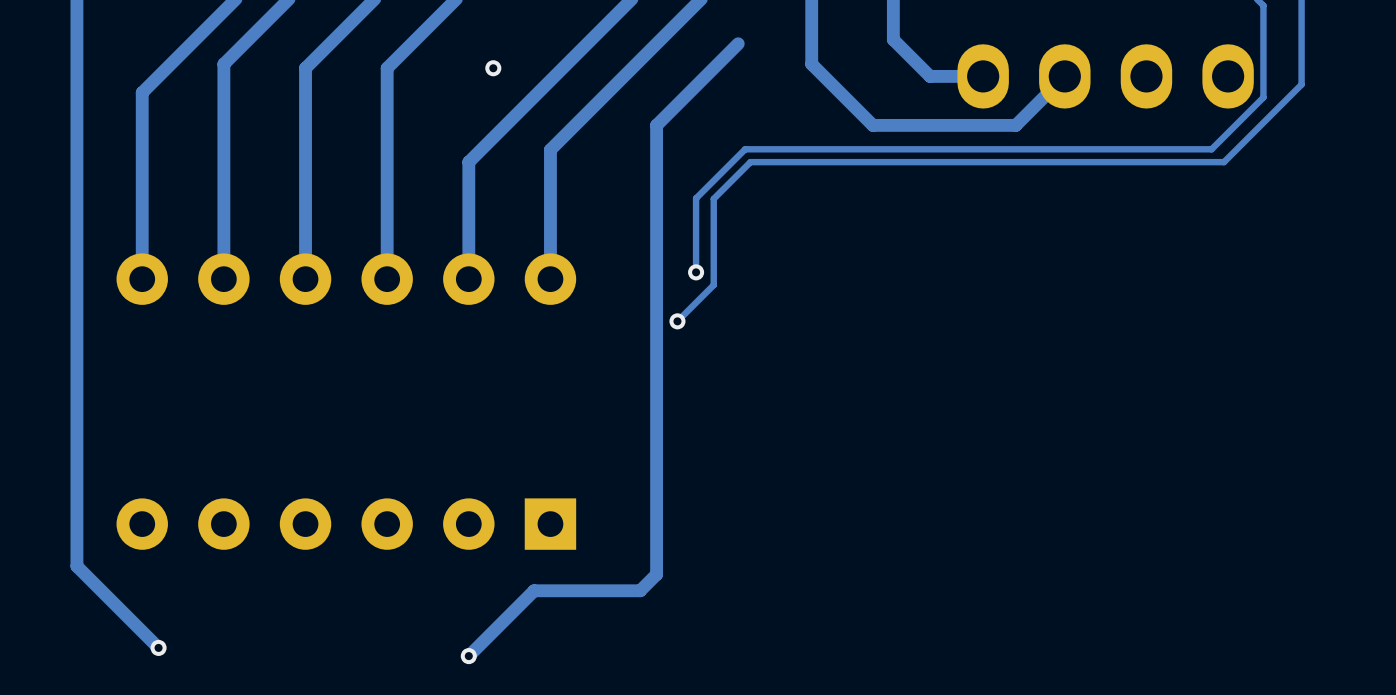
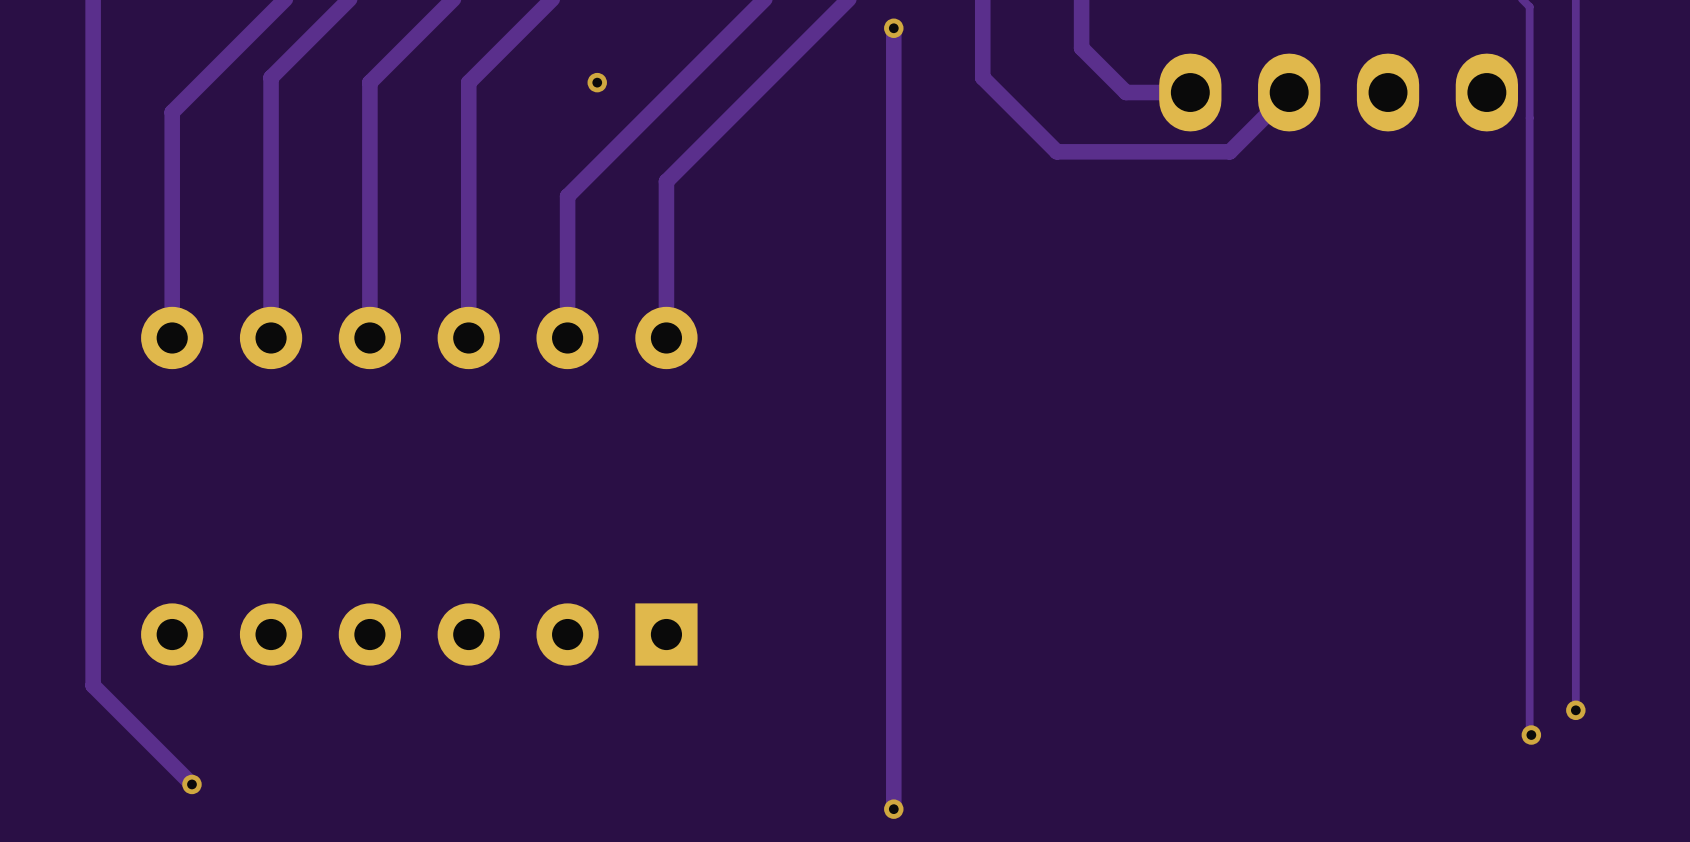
track: none -> (893, 28) (893, 809)
via: none -> (893, 28)
track: (738, 43) (656, 125) (656, 574) (640, 590) (534, 590) (468, 656) -> none
track: (1301, 84) (1224, 162) (750, 162) (713, 198) (713, 285) (677, 321) -> (1575, 102) (1575, 710)
track: (1263, 97) (1211, 149) (745, 149) (696, 198) (696, 272) -> (1529, 118) (1529, 733) (1531, 735)
via: (696, 272) -> none
via: (677, 321) -> none
via: none -> (1575, 710)
via: none -> (1531, 735)
via: (468, 656) -> none
via: none -> (893, 809)

